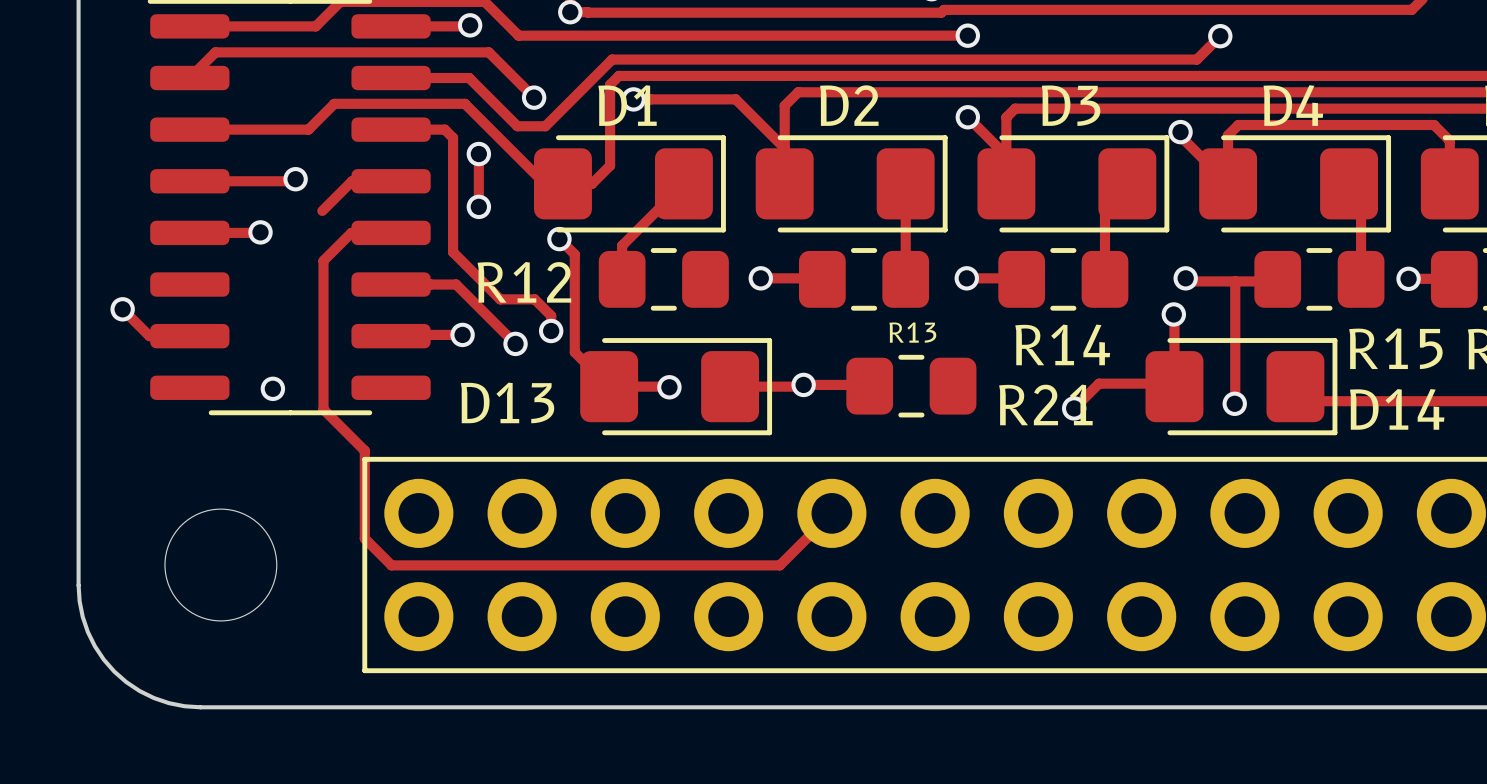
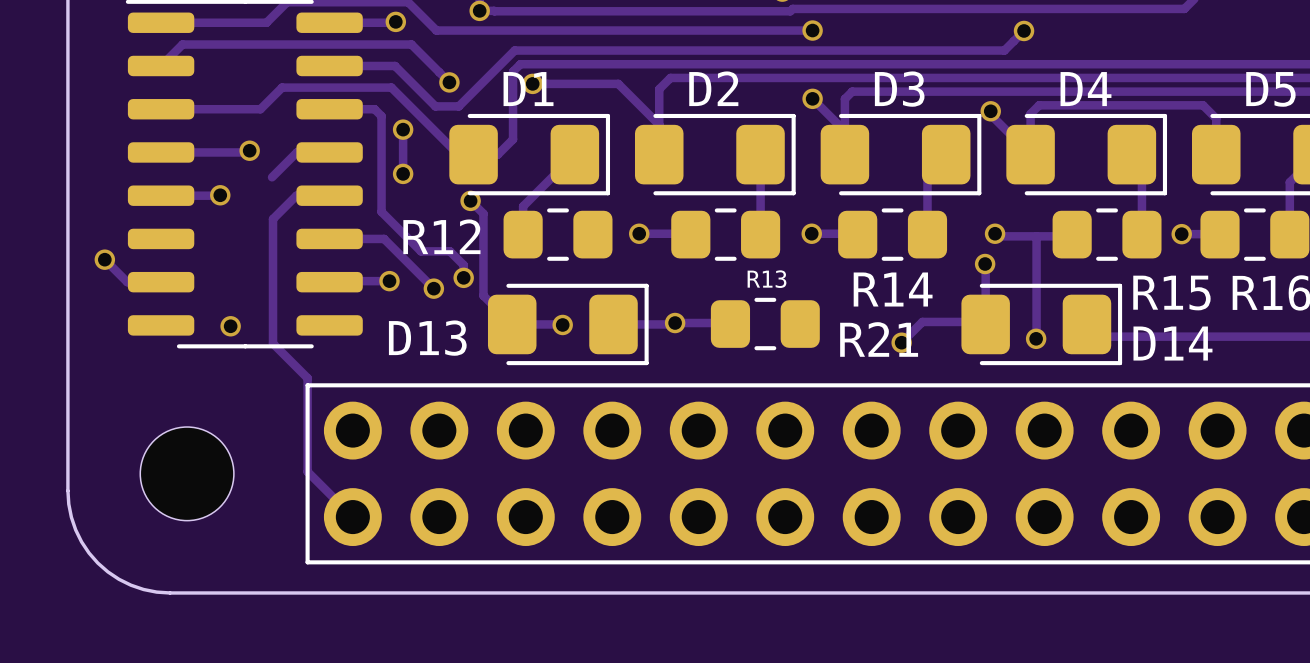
track: (831, 513) (779, 565) (391, 565) (364, 538) -> (352, 517) (307, 471) (307, 451)

